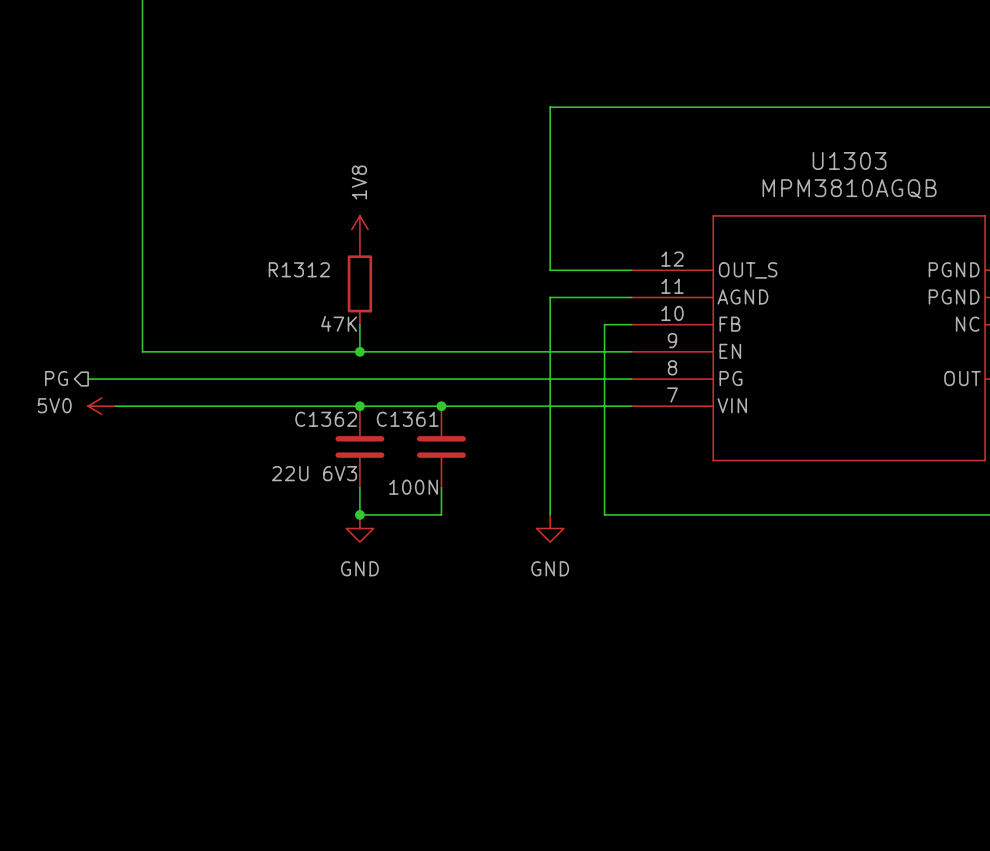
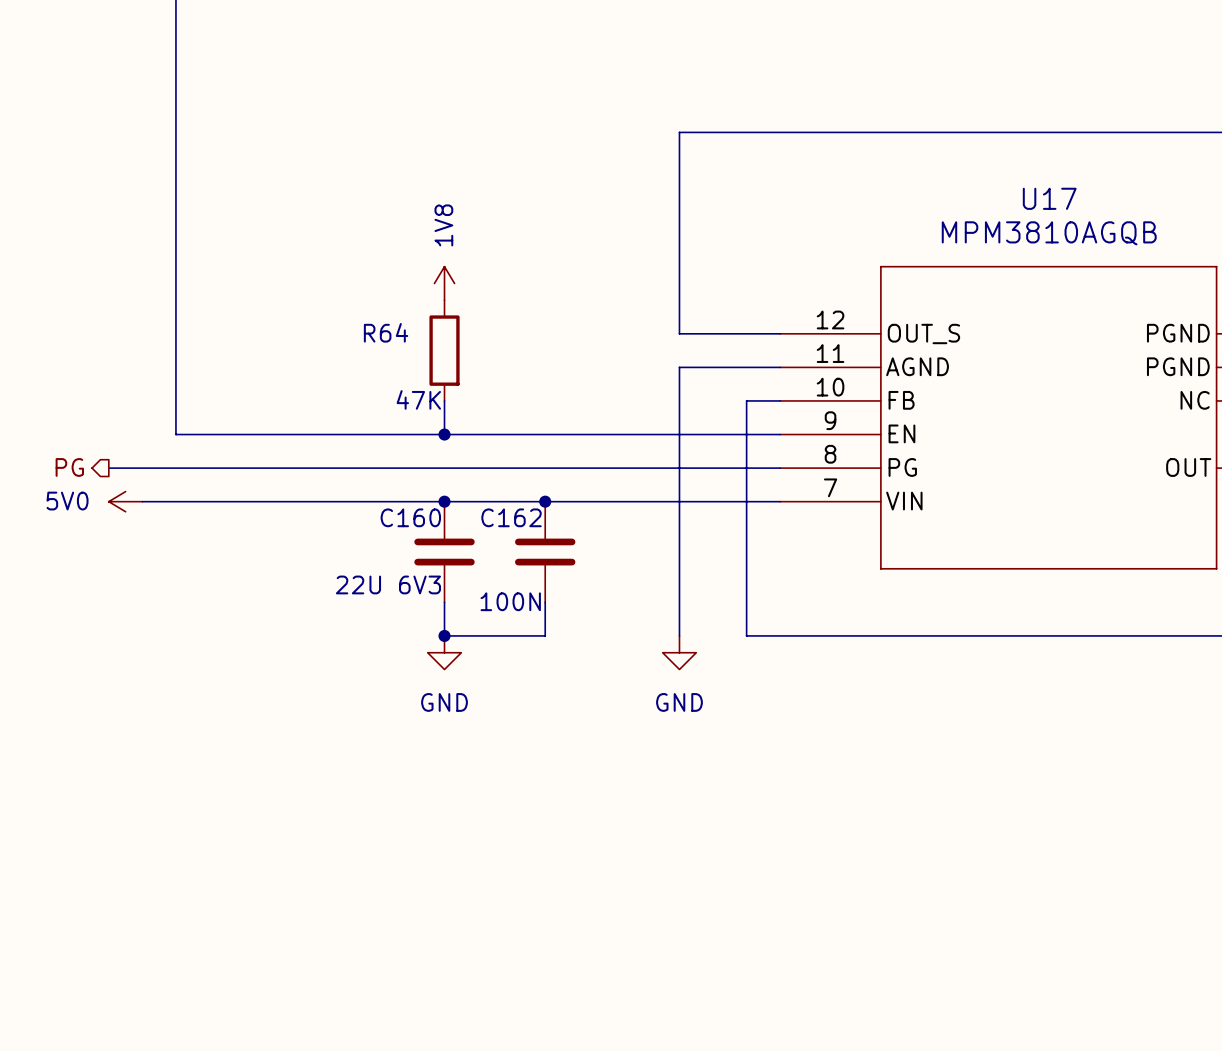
U1303 name: U1303 (849, 160) -> U17 (1049, 198)
R1312 name: R1312 (299, 269) -> R64 (386, 332)
C1362 name: C1362 (326, 419) -> C160 (410, 517)
C1361 name: C1361 (407, 419) -> C162 (511, 517)

